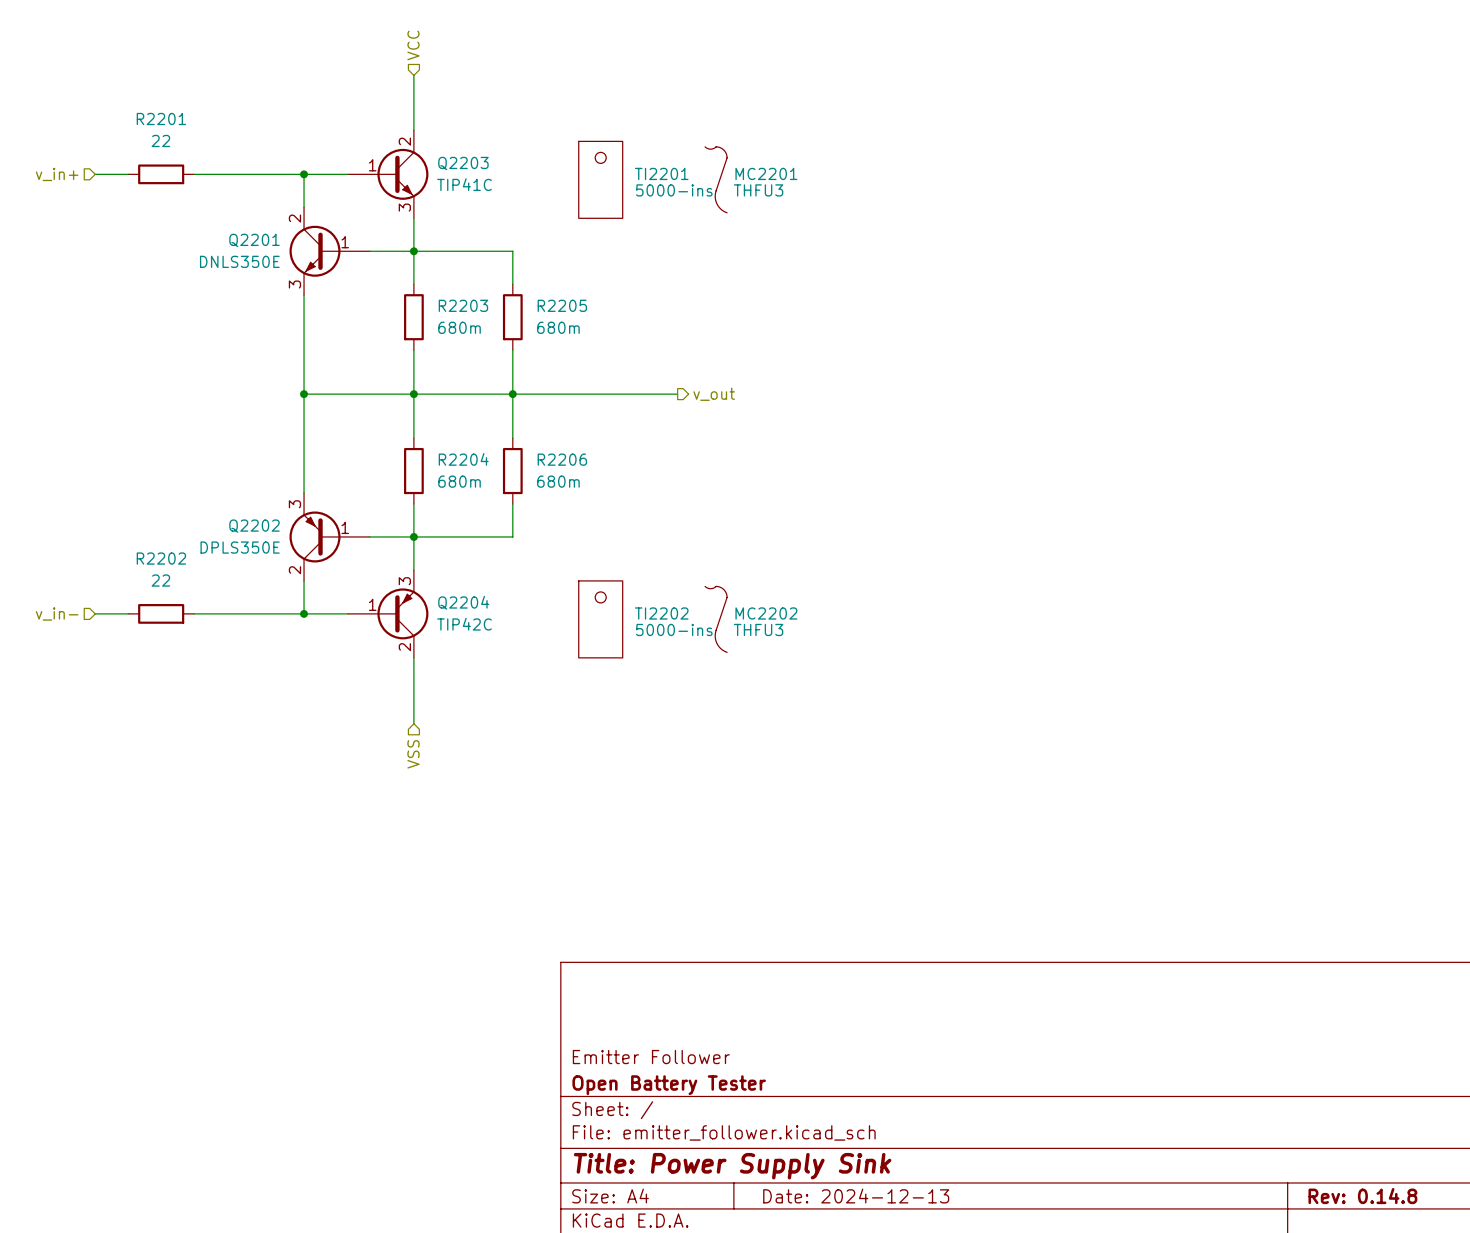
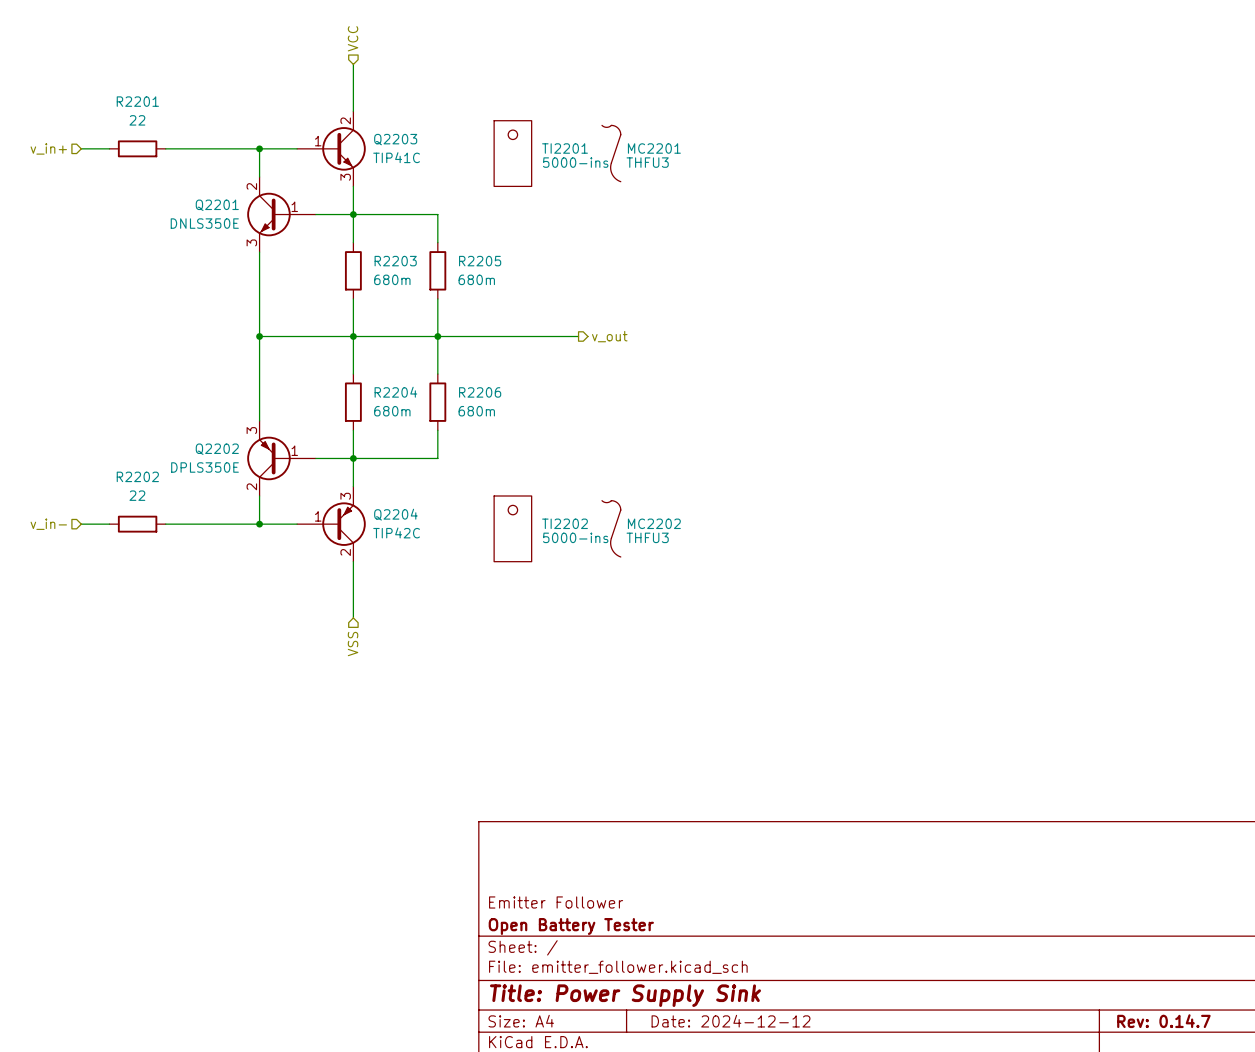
title block: Date: 2024-12-13 (856, 1196) -> Date: 2024-12-12 (731, 1021)
title block: Rev: 0.14.8 (1362, 1196) -> Rev: 0.14.7 (1163, 1021)

